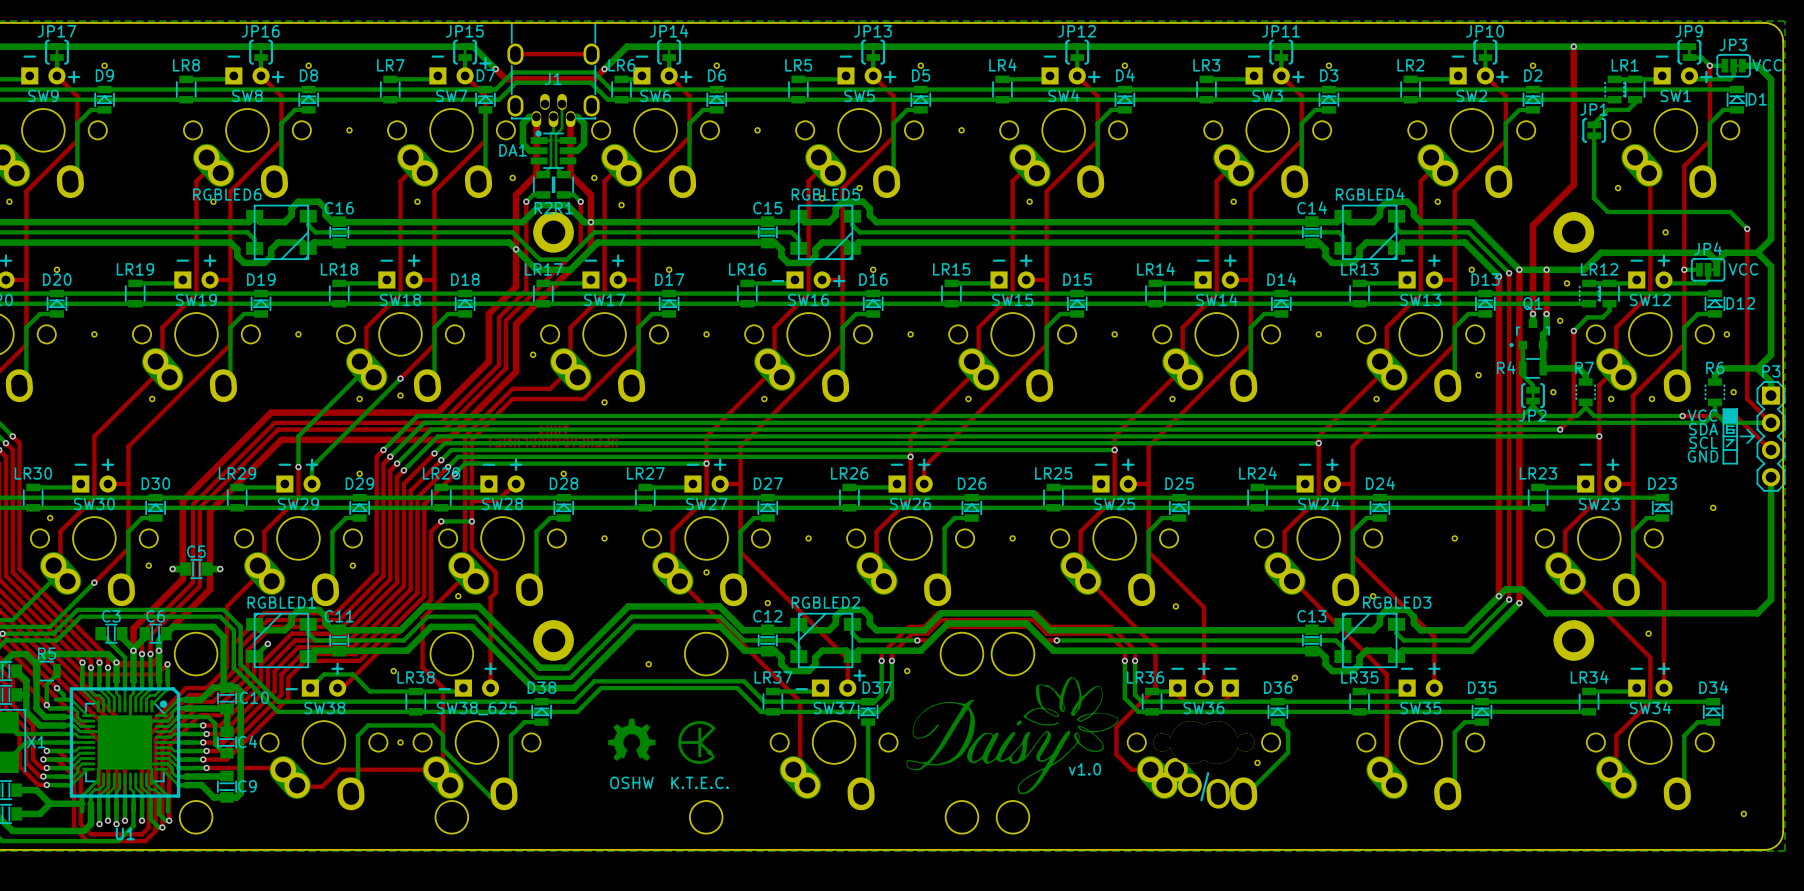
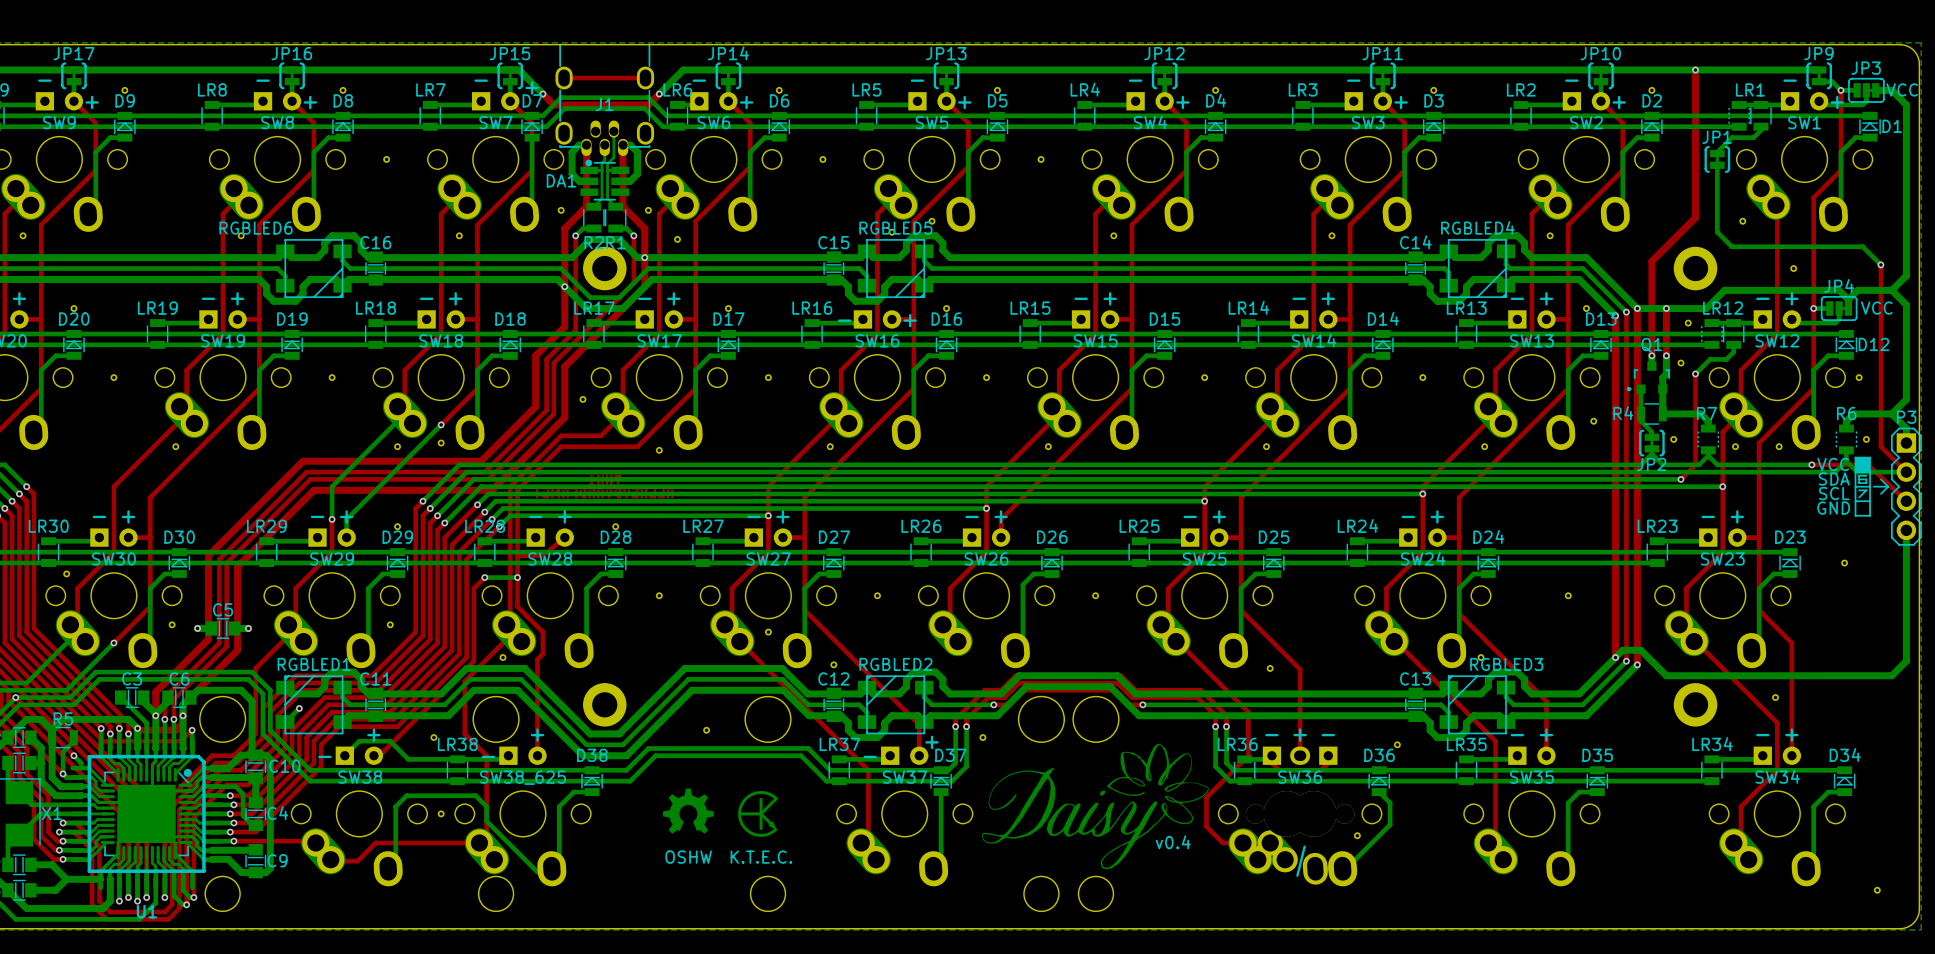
text: v1.0 (1084, 769) -> v0.4 (1173, 842)

